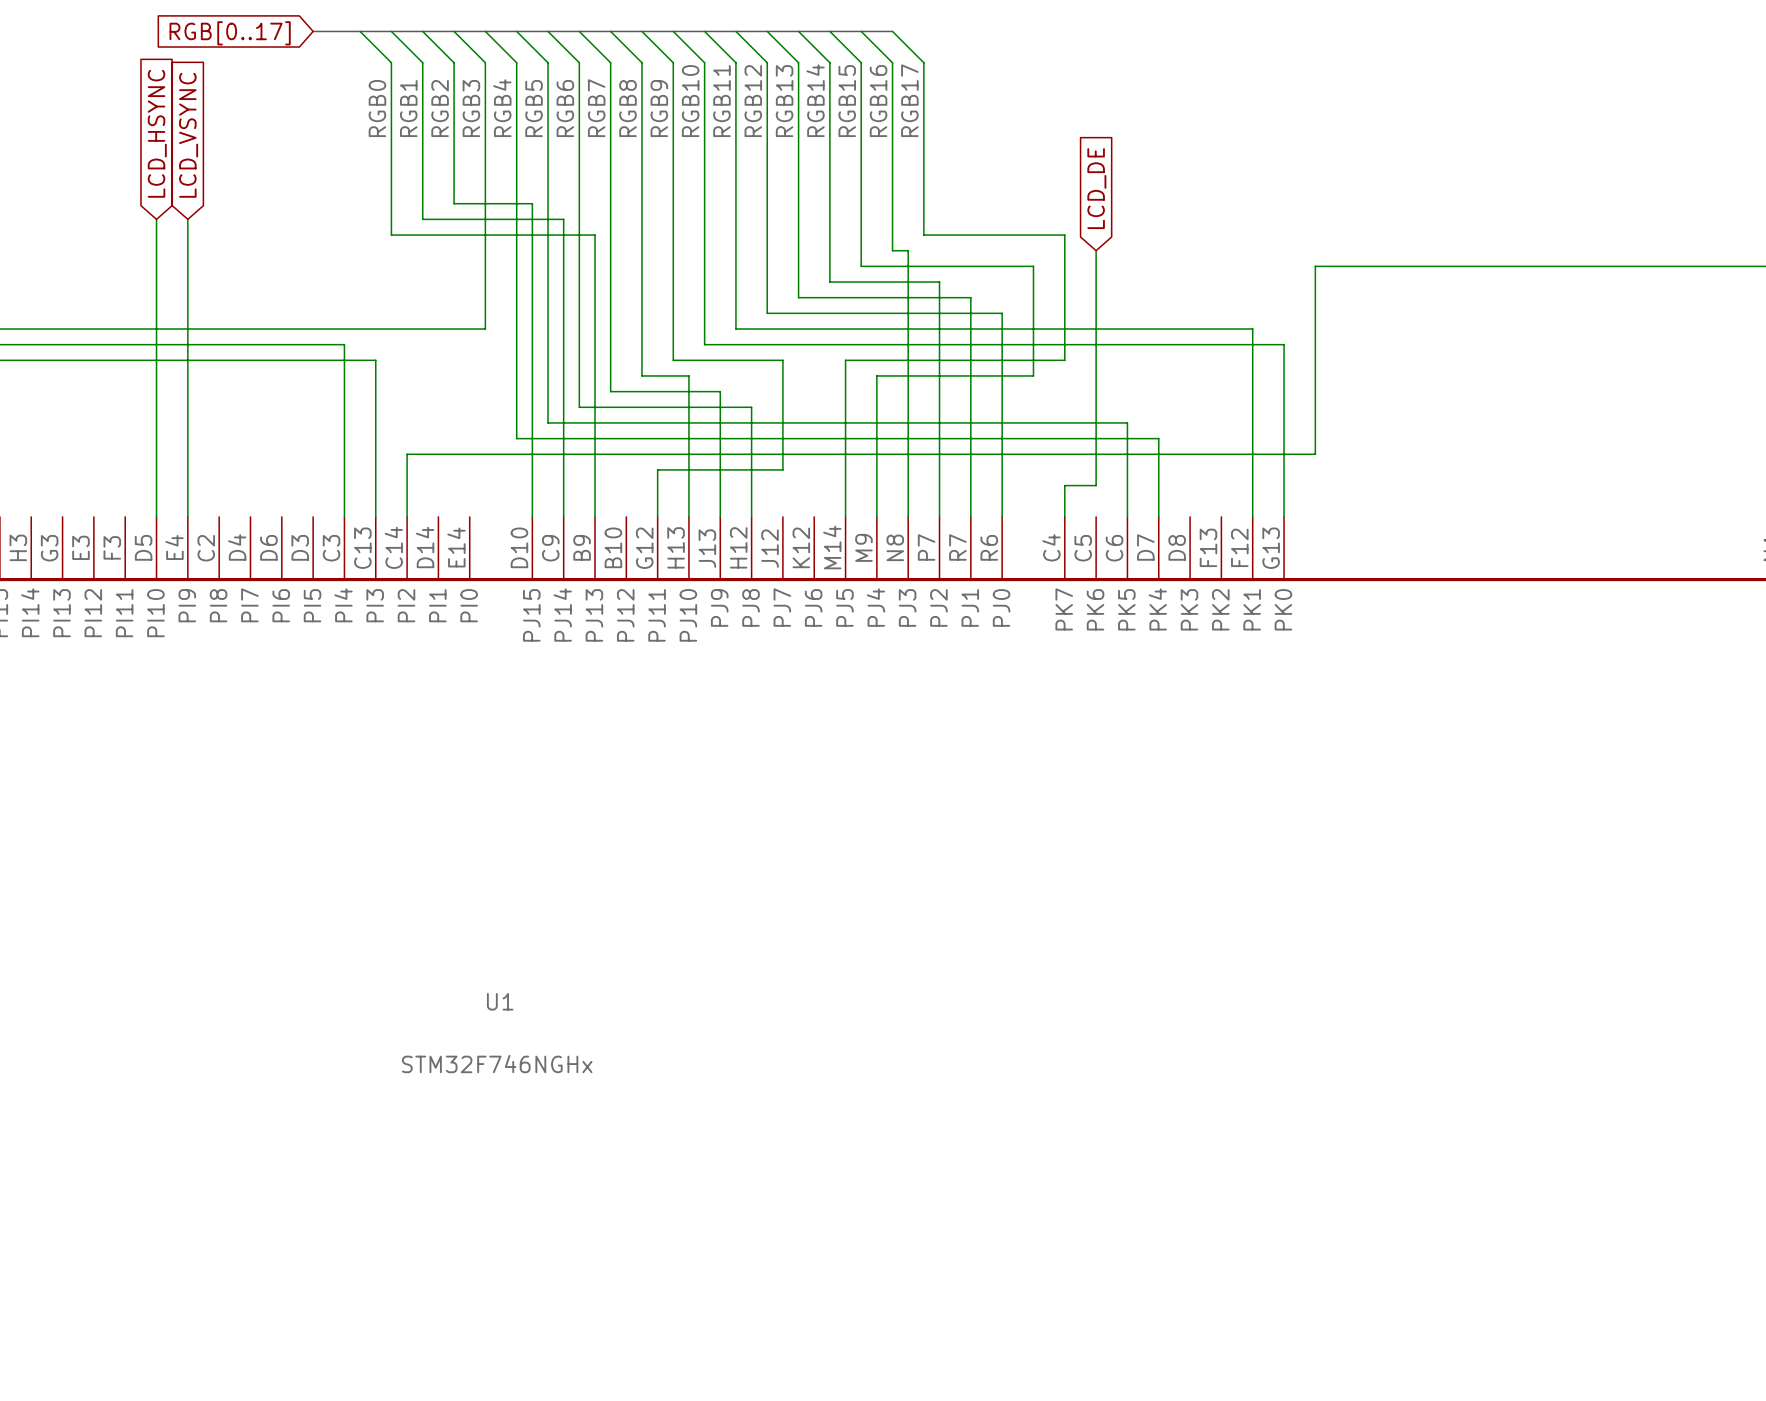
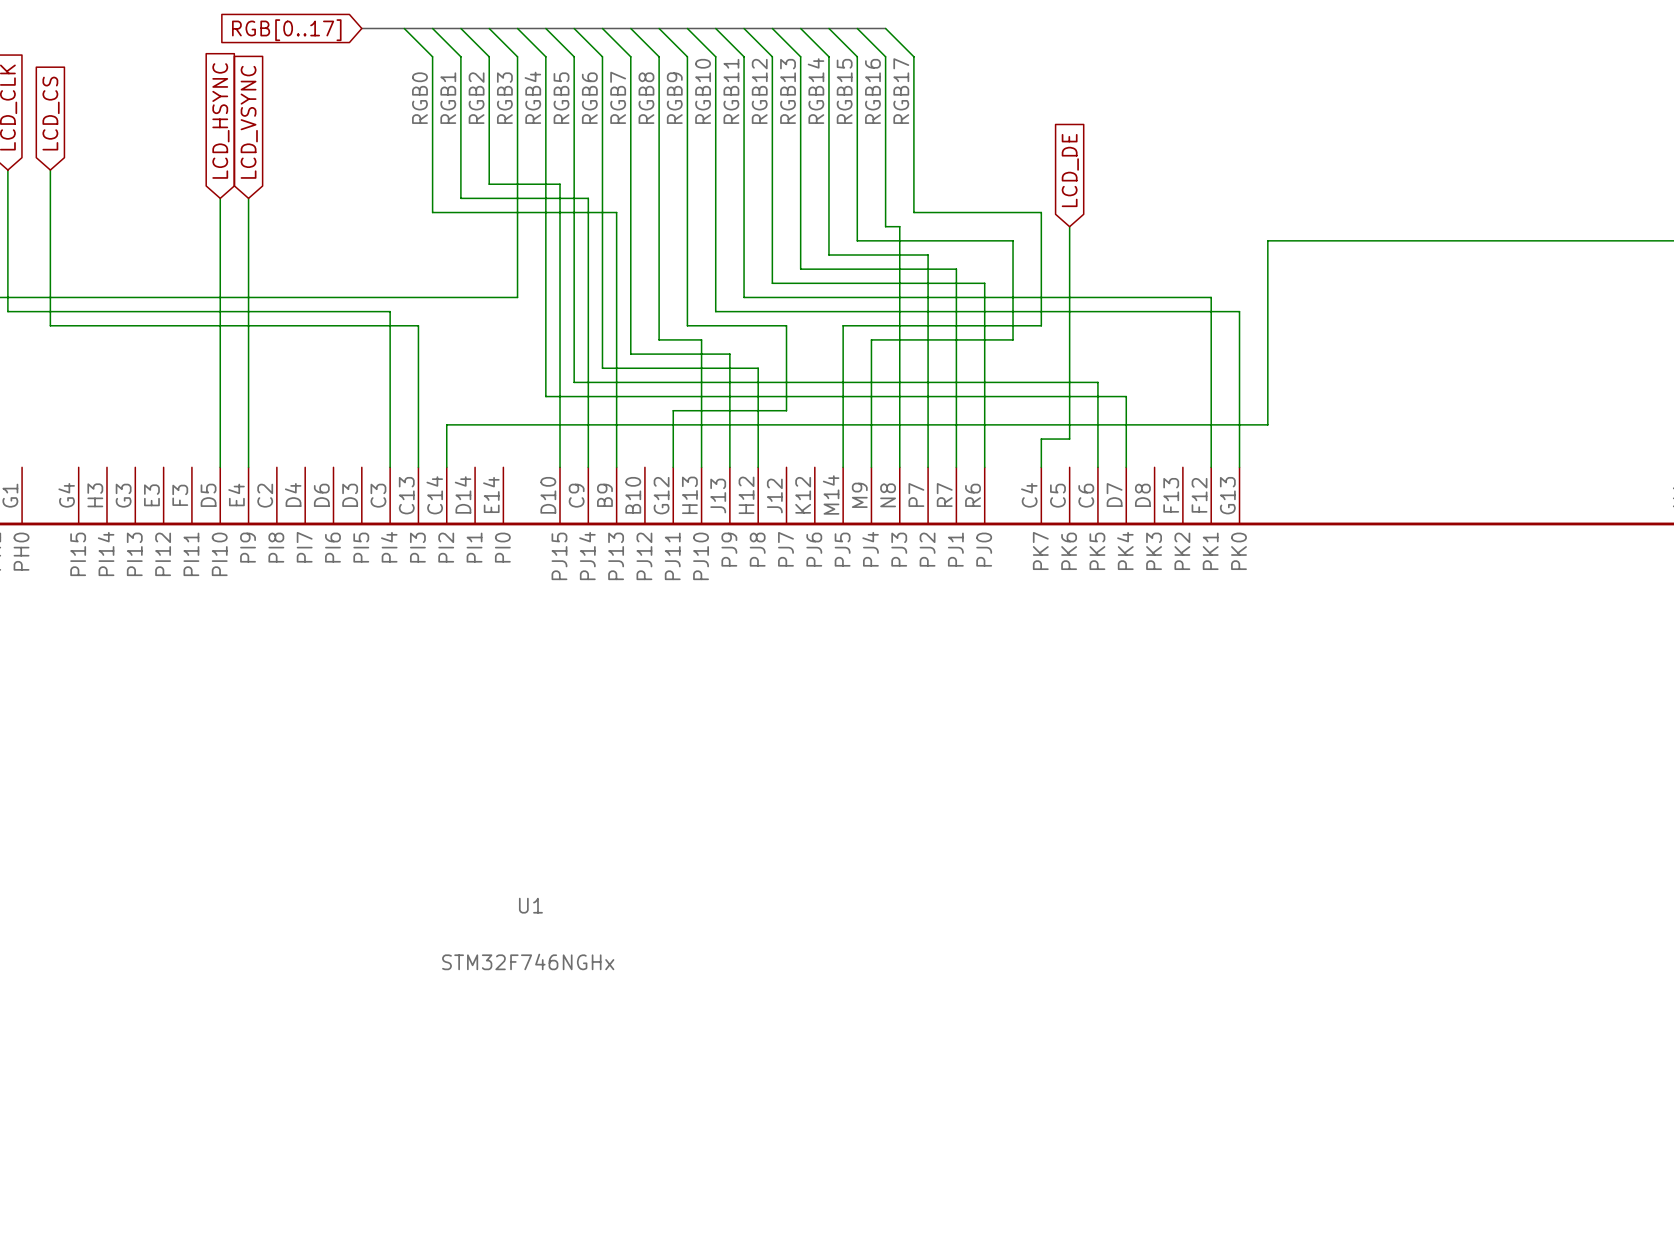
wire: (657, 454) (407, 454) (407, 469) -> (673, 410) (673, 424) (446, 424)
wire: (1315, 454) (782, 454) (782, 469) -> (1267, 410) (1267, 424) (786, 424)

